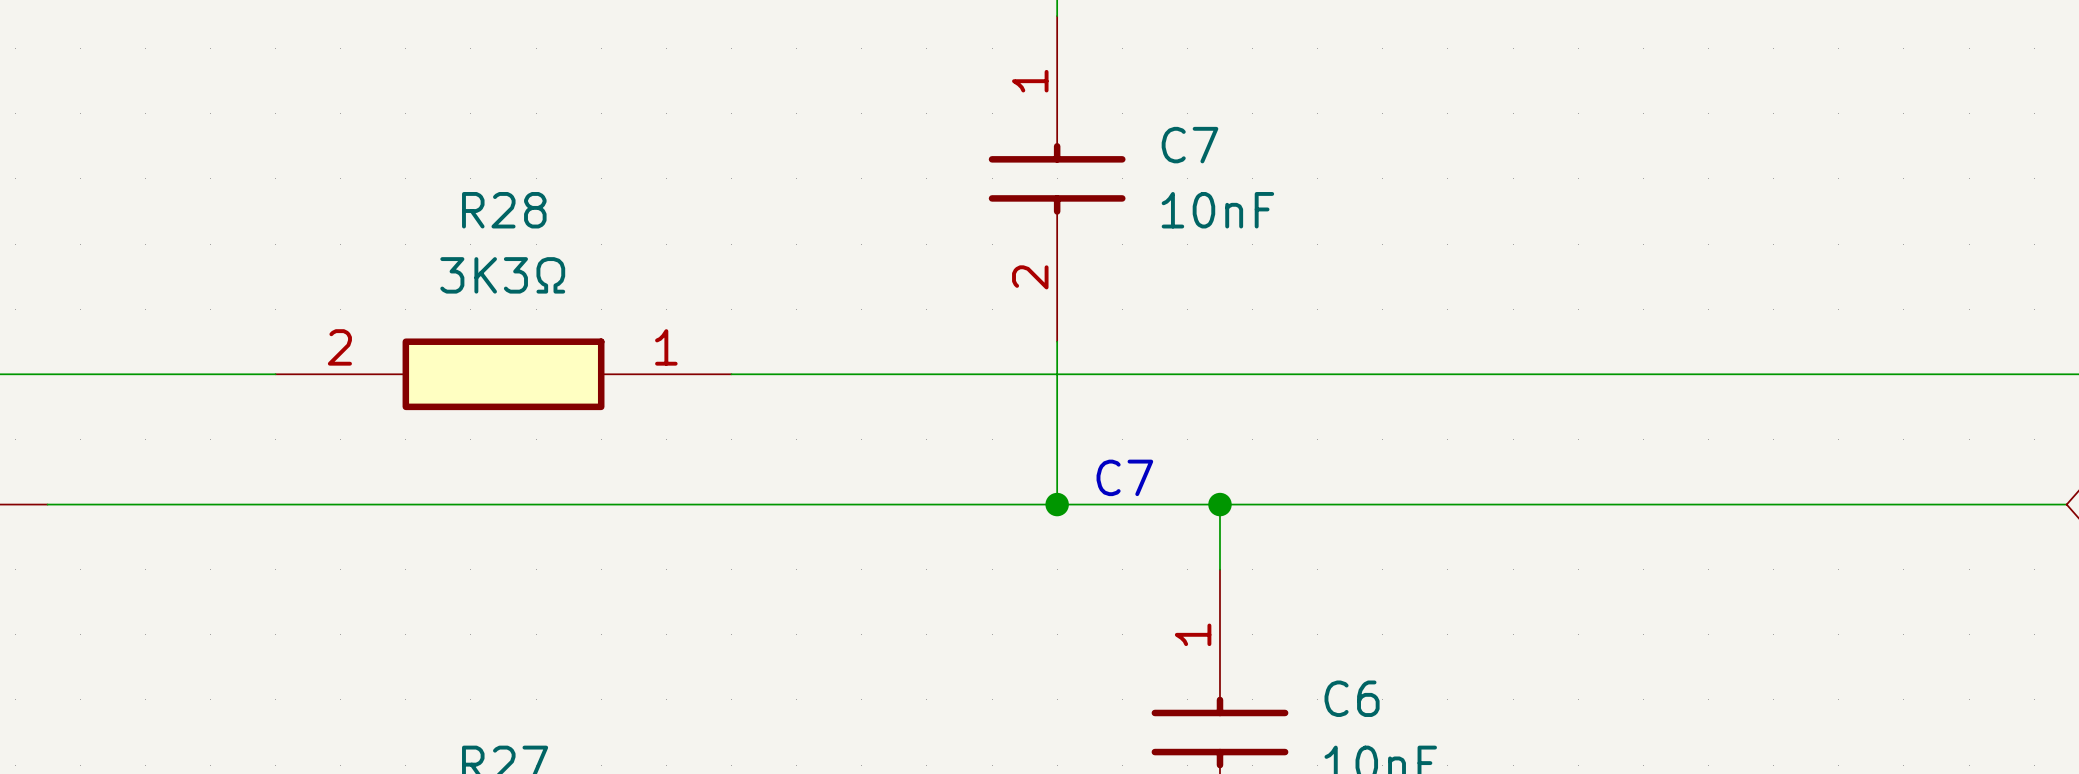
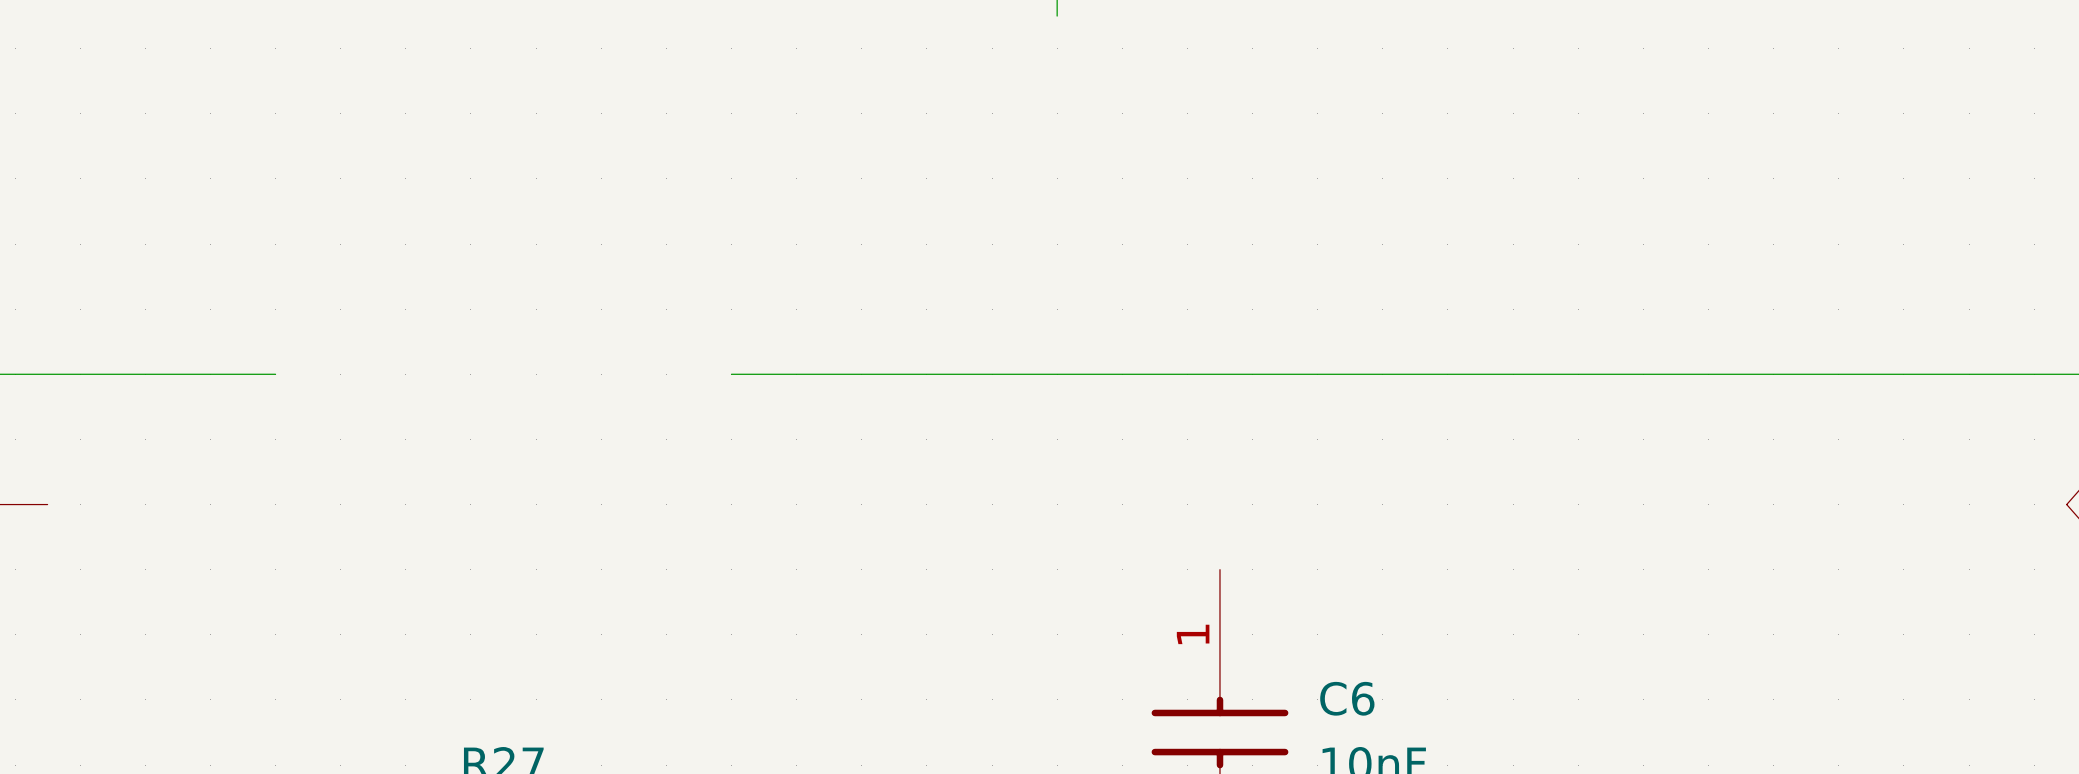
C7: 10nF (1057, 178) -> none
wire: (1057, 341) (1057, 504) -> none
R28: 3K3Ω (503, 374) -> none
text: C7 (1124, 477) -> none
wire: (47, 504) (2066, 504) -> none
junction: (1057, 504) -> none
wire: (1219, 504) (1219, 569) -> none
junction: (1219, 504) -> none

